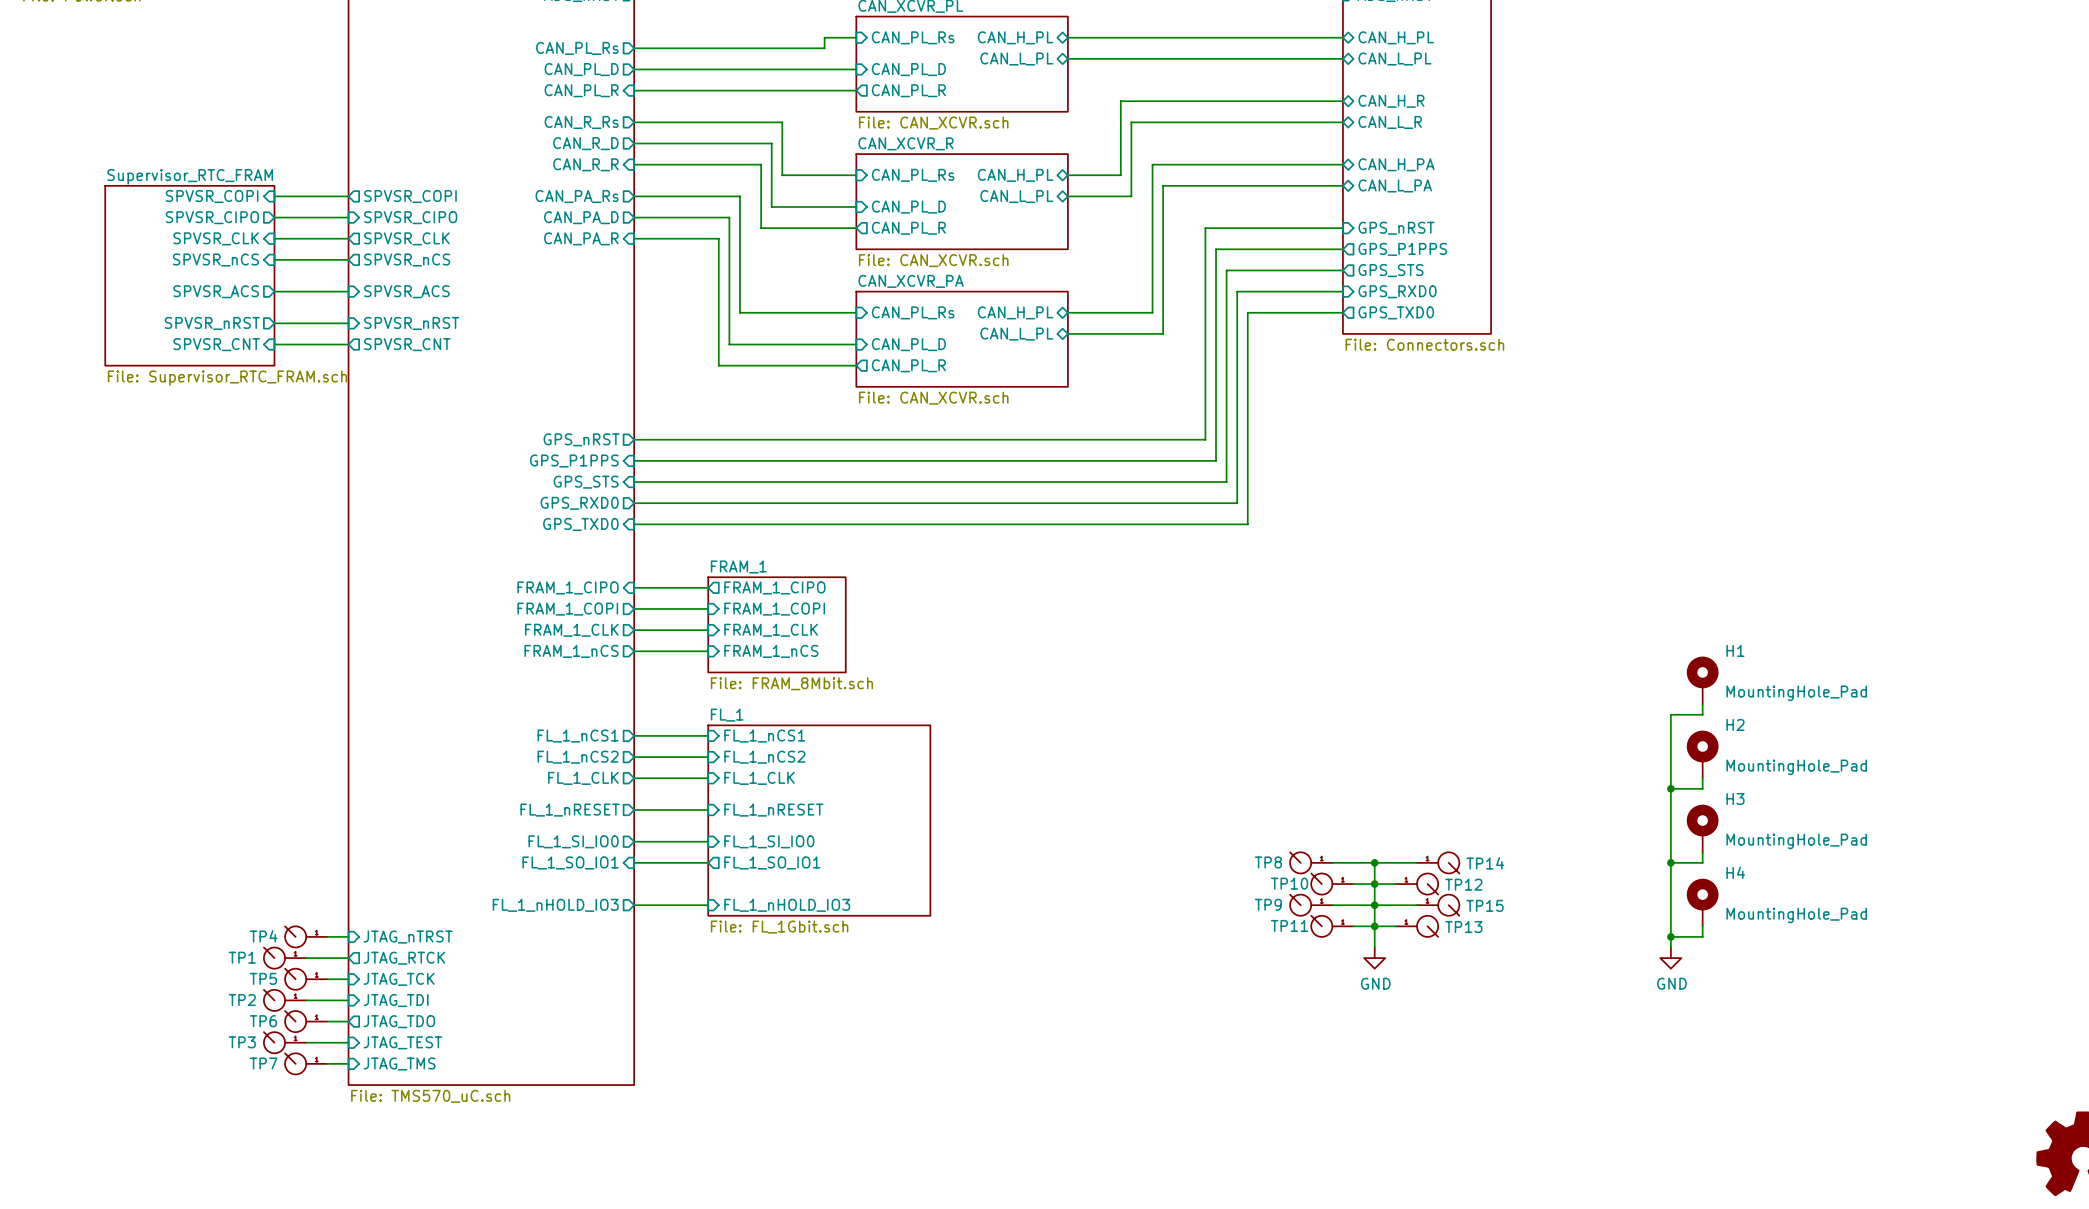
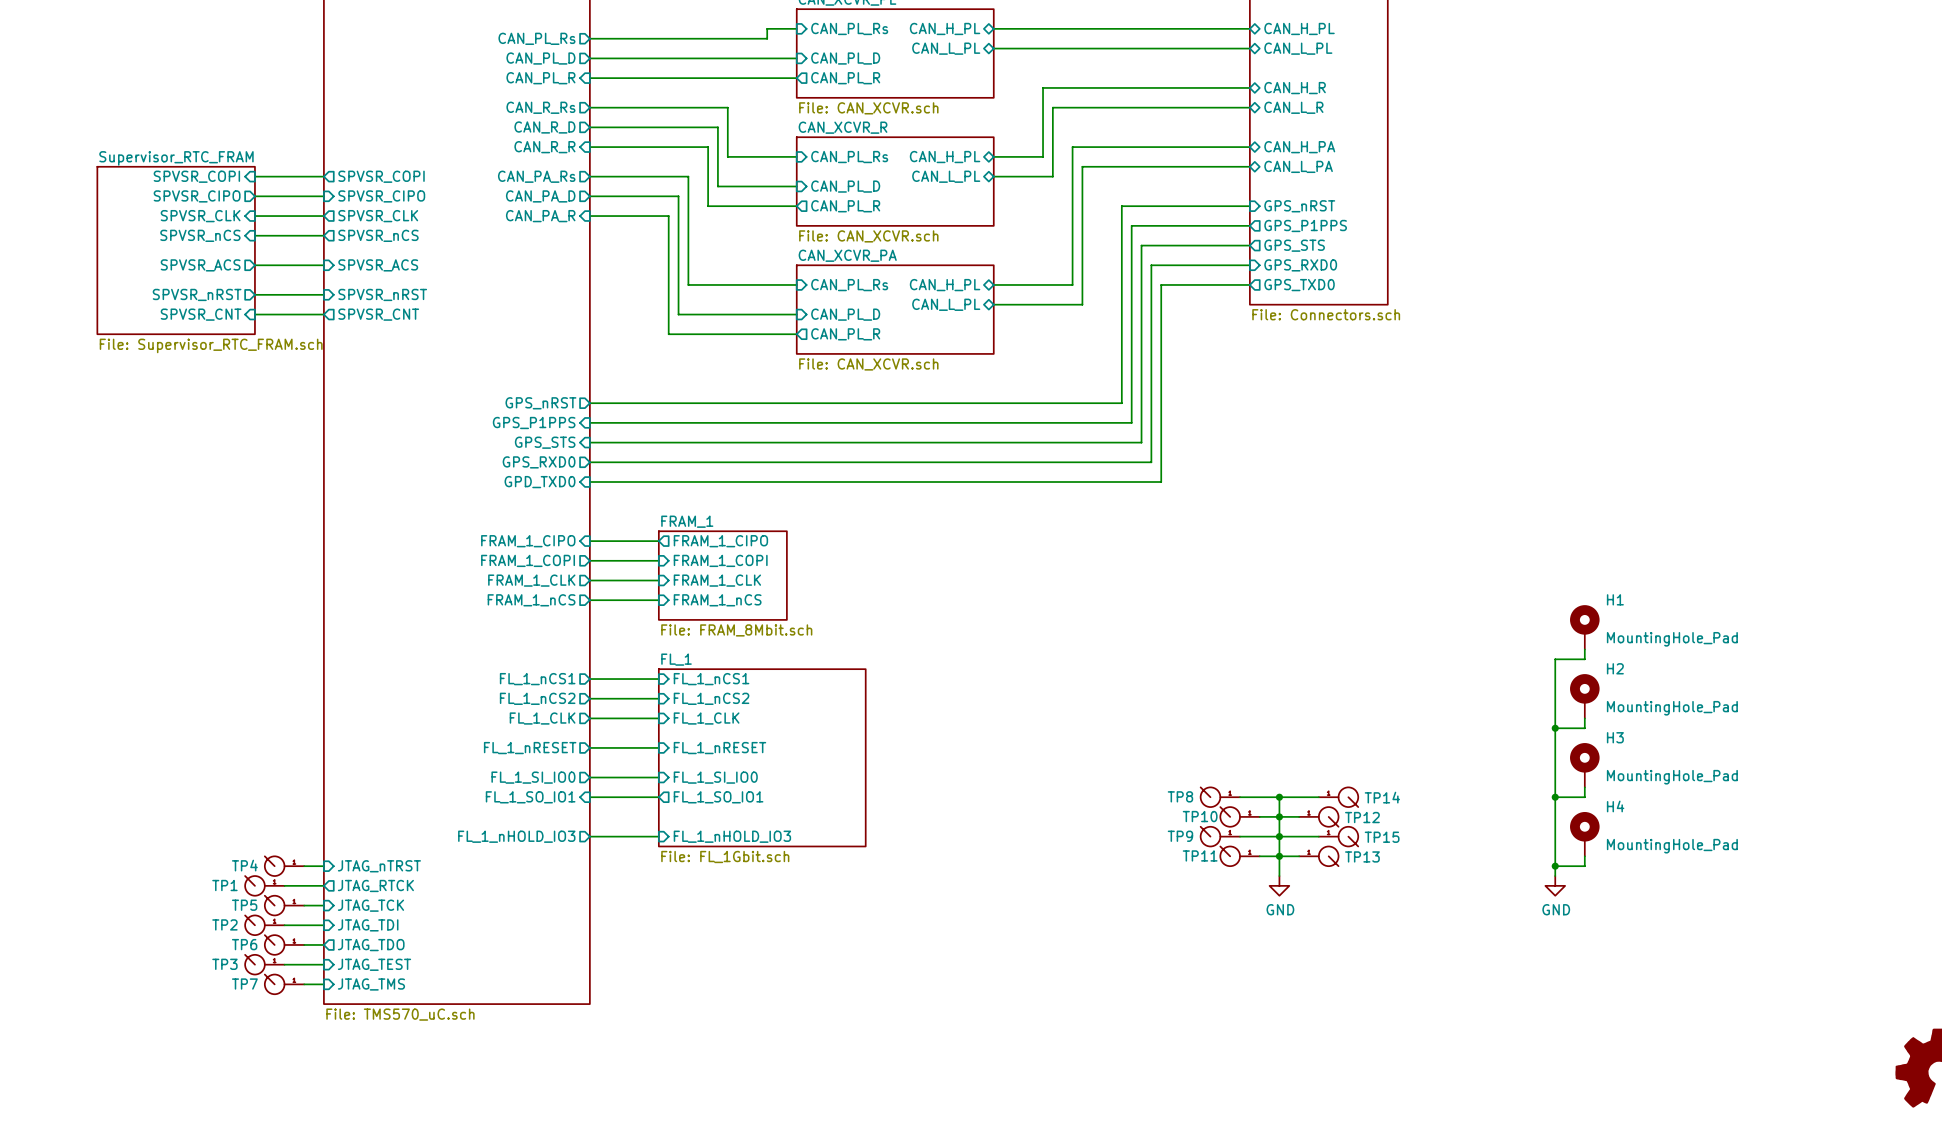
sheet pin: GPS_TXD0 (580, 524) -> GPD_TXD0 (540, 482)

